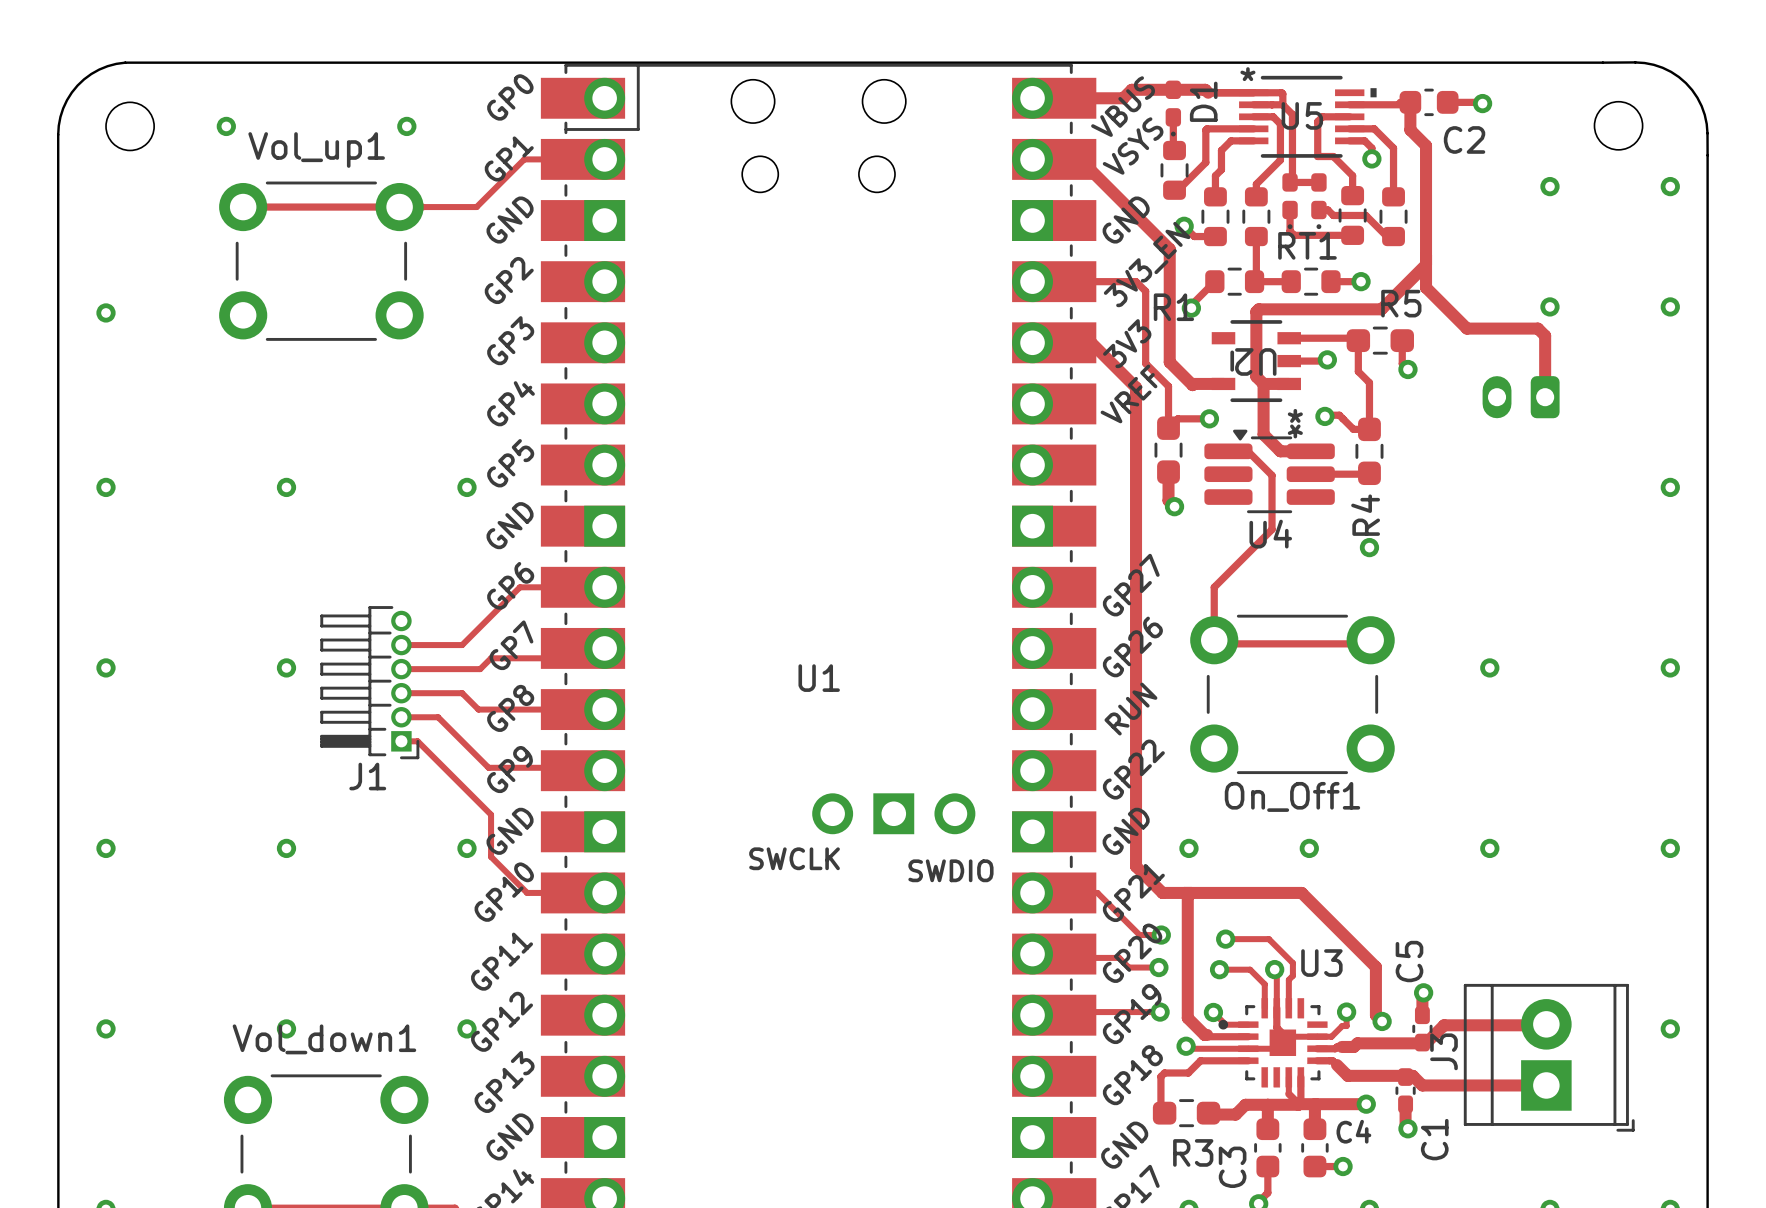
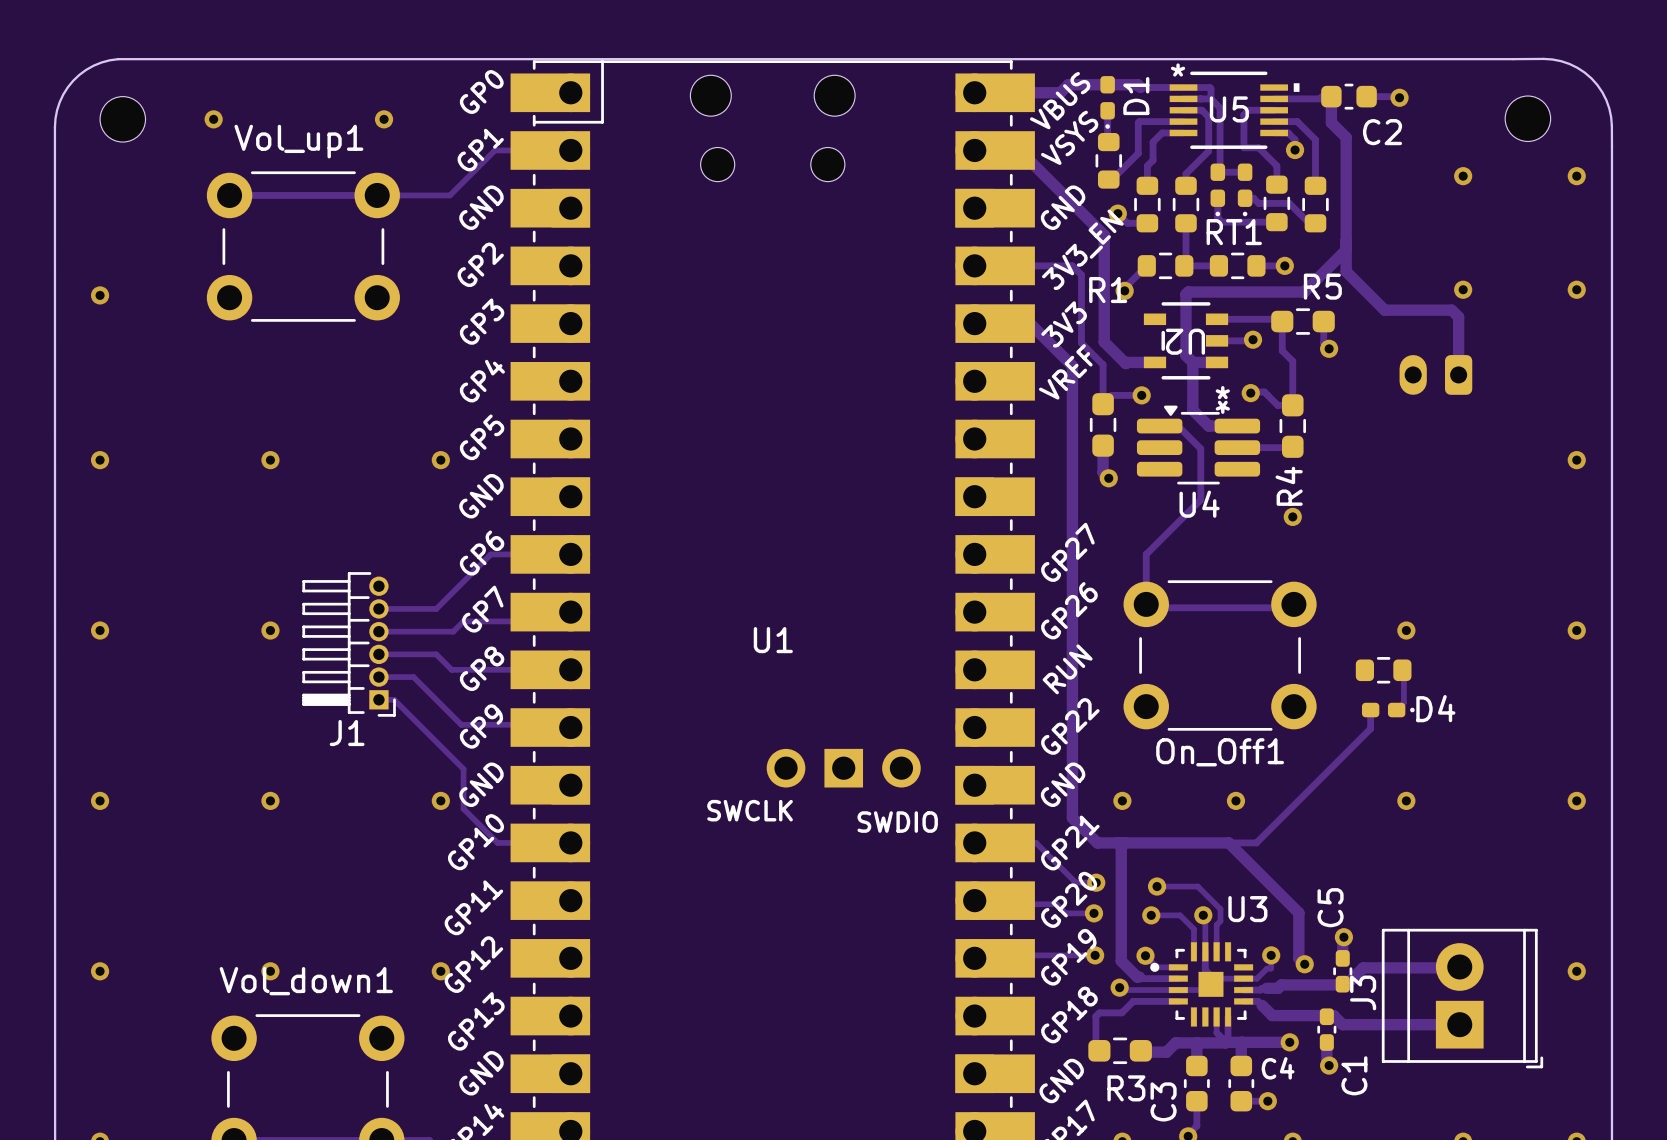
part: none -> (1383, 670)
track: none -> (1403, 681) (1403, 702) (1396, 710)
track: none -> (1370, 710) (1370, 728) (1256, 842) (1224, 842)
D4: none -> (1388, 710)

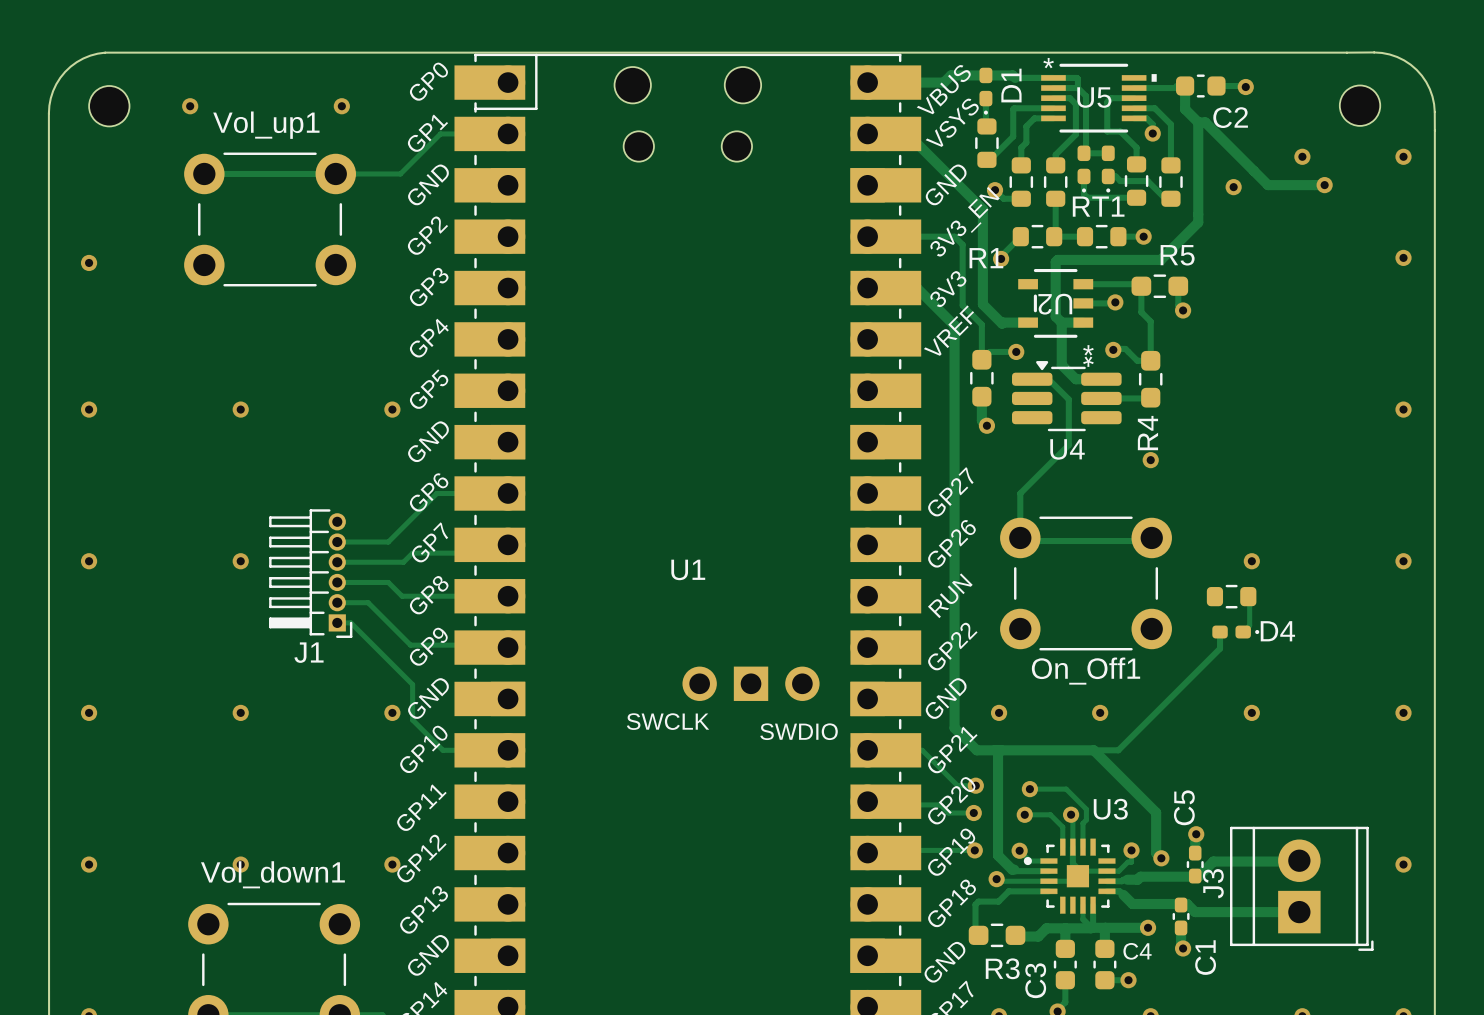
track: none -> (1198, 122) (1205, 122) (1268, 185) (1324, 185)
via: none -> (1324, 185)
via: none -> (1233, 187)
track: (1346, 249) (1346, 271) (1384, 310) (1451, 310) (1458, 317) (1458, 374) -> none
via: (1463, 289) -> none
part: (1435, 374) -> none

